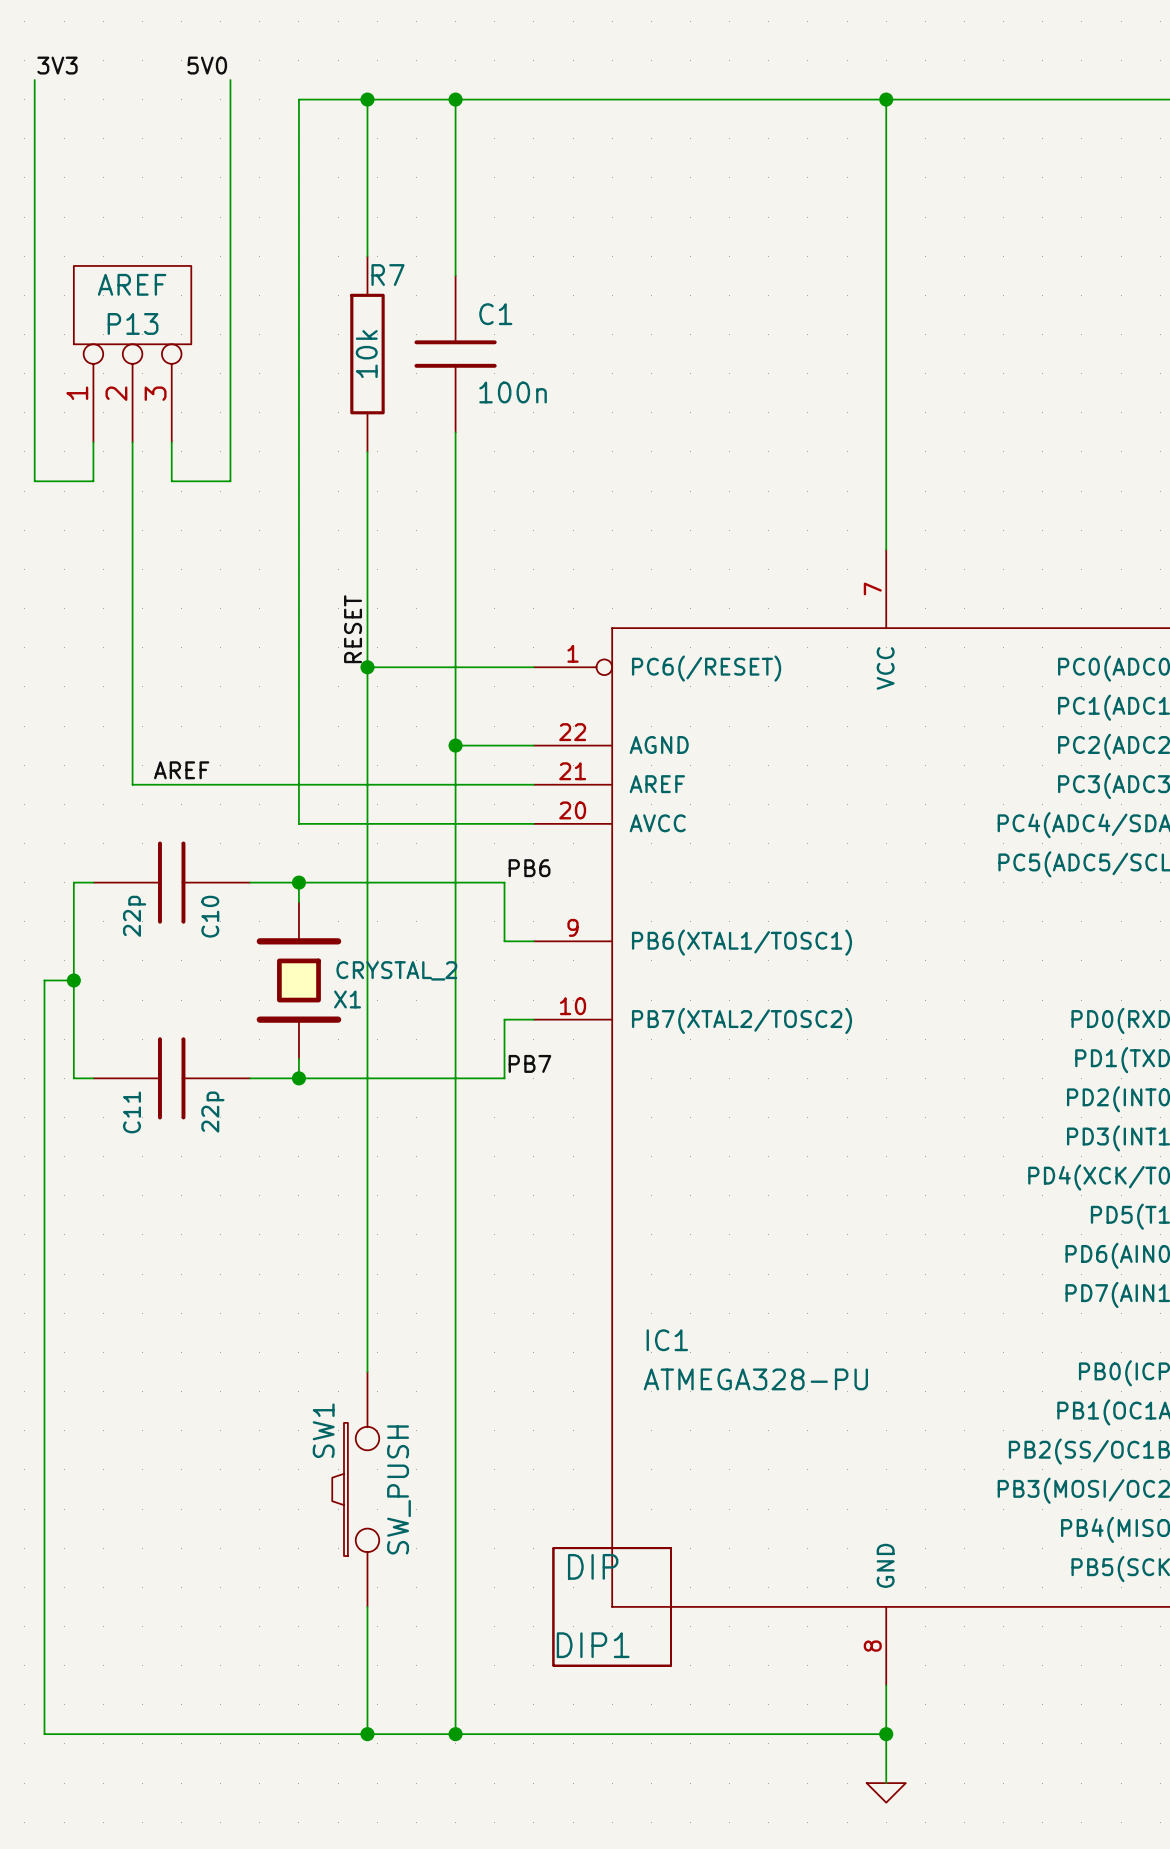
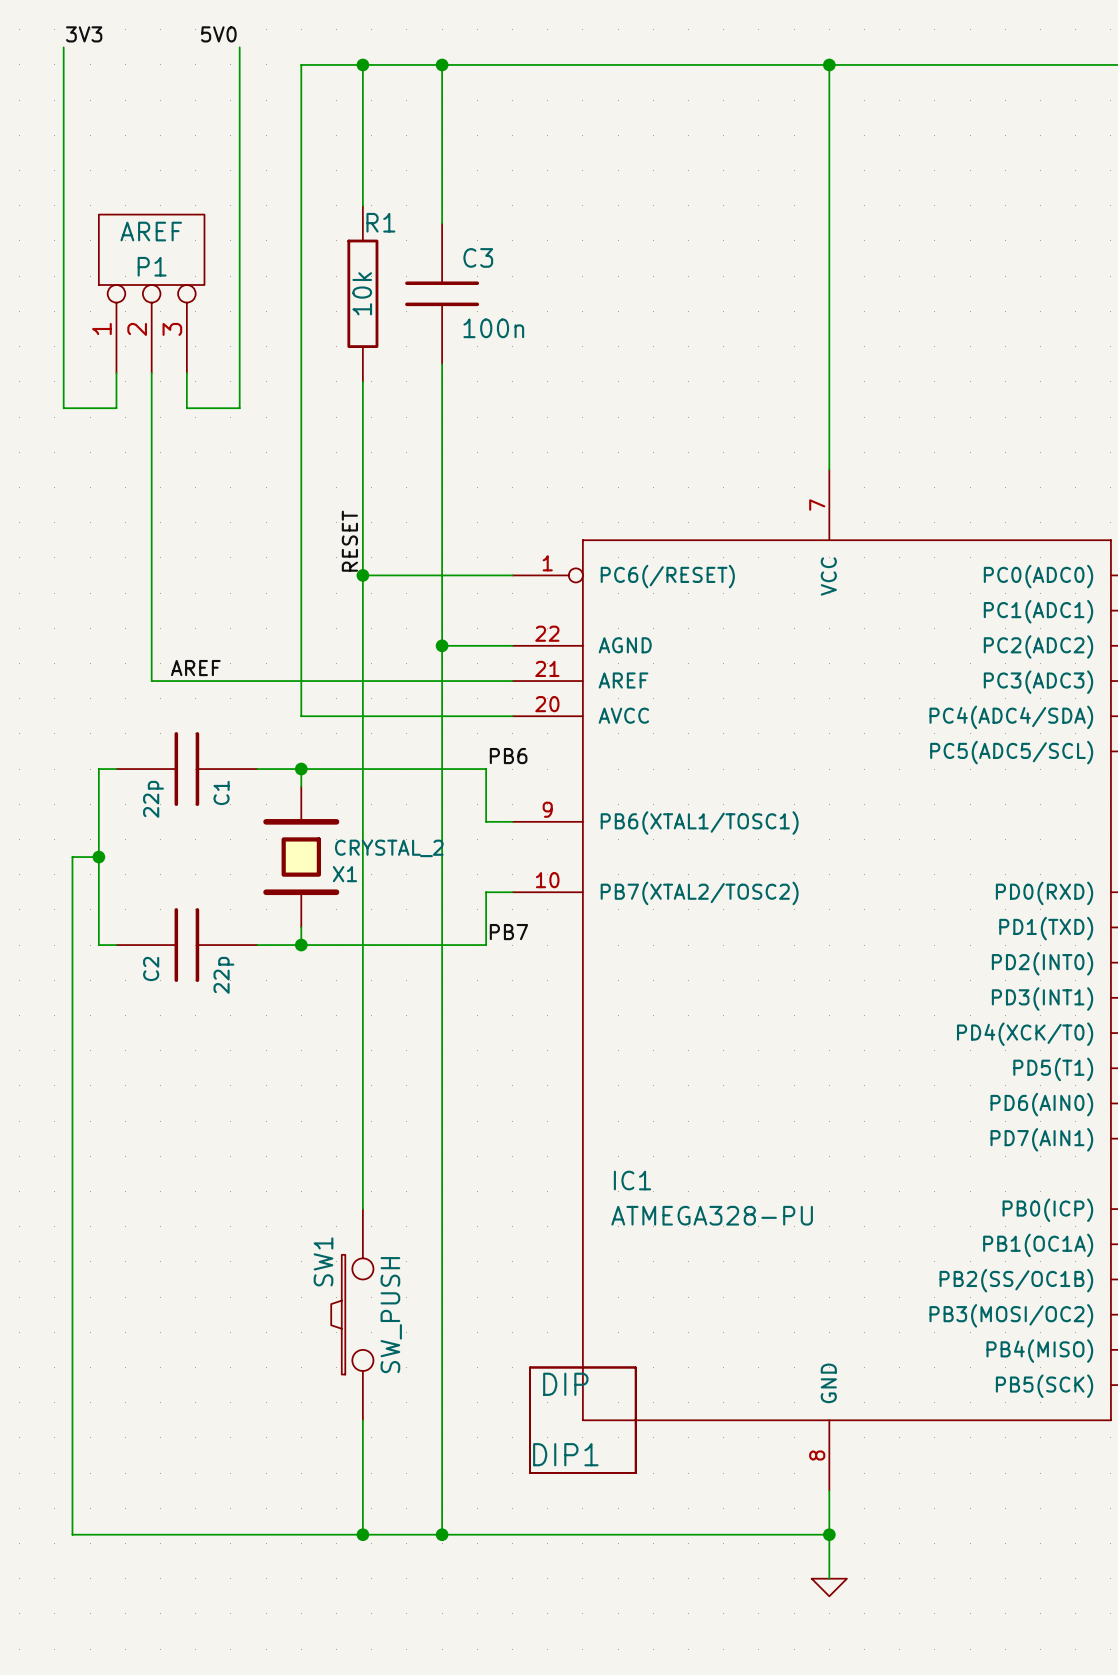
R7 name: R7 (387, 275) -> R1 (380, 222)
C1 name: C1 (495, 314) -> C3 (478, 257)
P13 name: P13 (133, 323) -> P1 (152, 266)
C10 name: C10 (210, 916) -> C1 (221, 792)
C11 name: C11 (131, 1112) -> C2 (151, 968)

